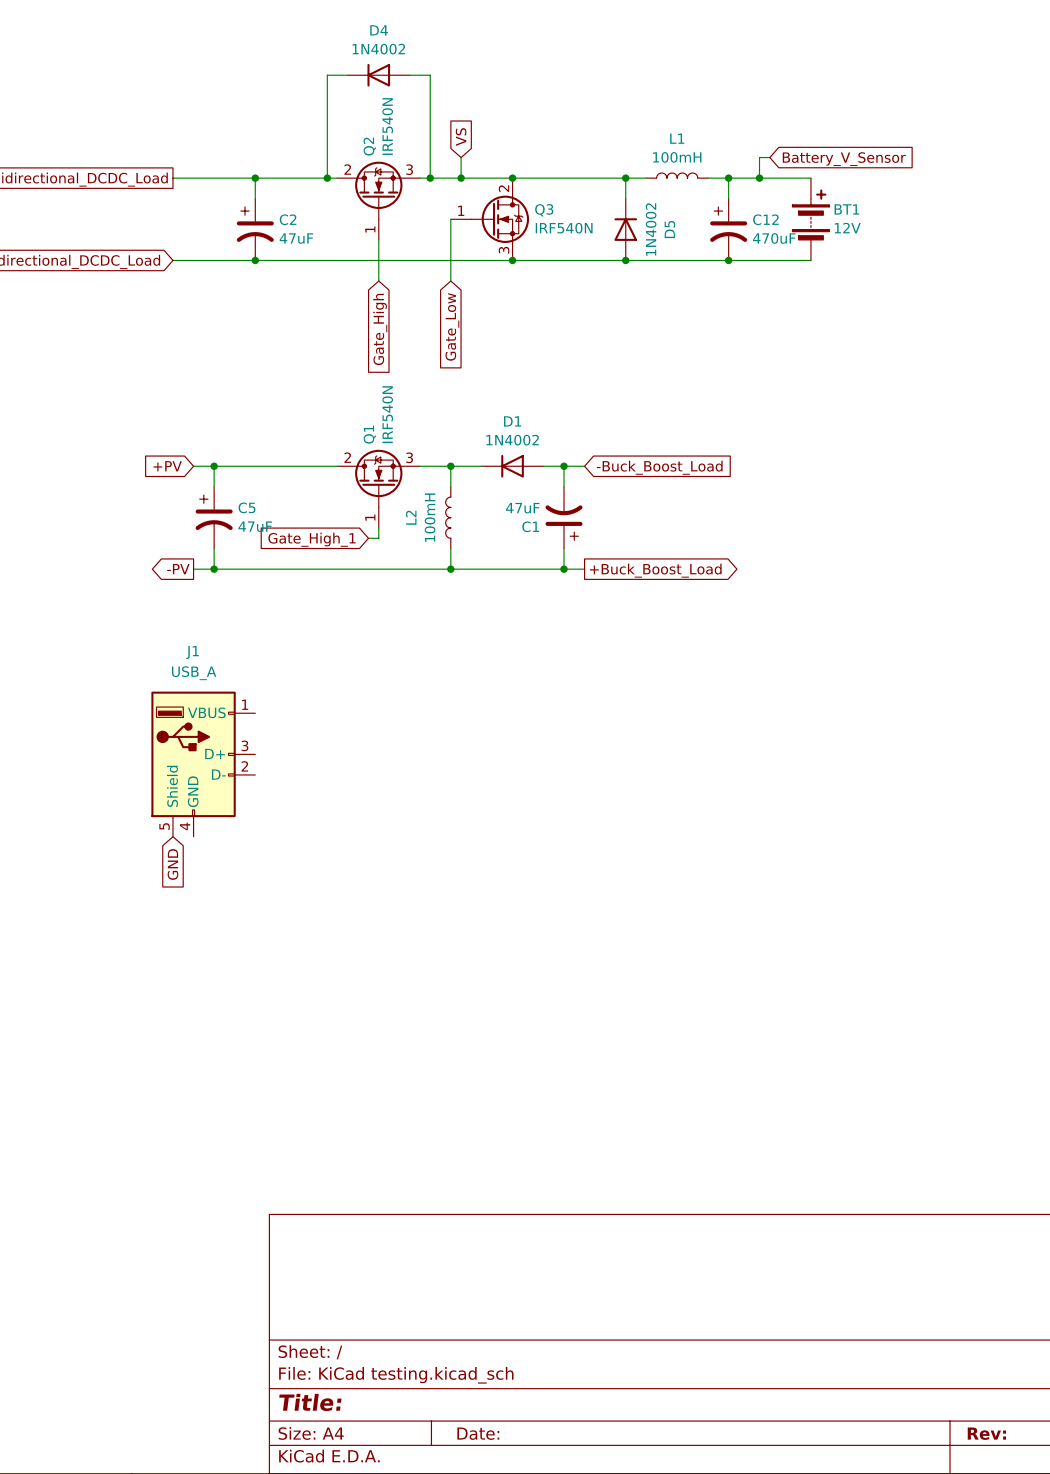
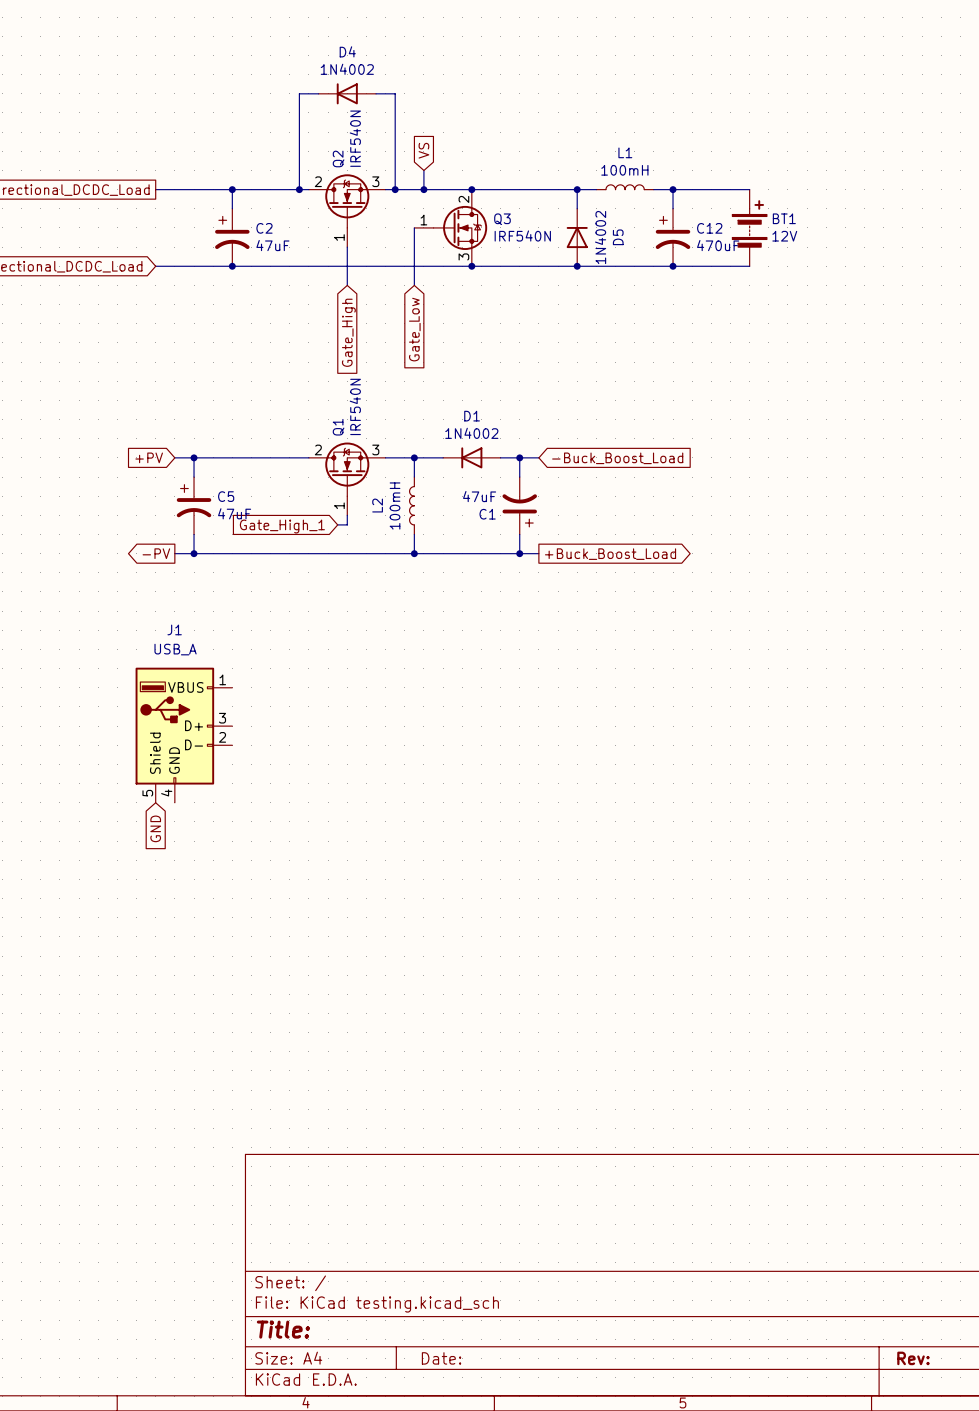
wire: (769, 157) (759, 157) (759, 178) -> none
global label: Battery_V_Sensor (844, 159) -> none
junction: (759, 178) -> none

